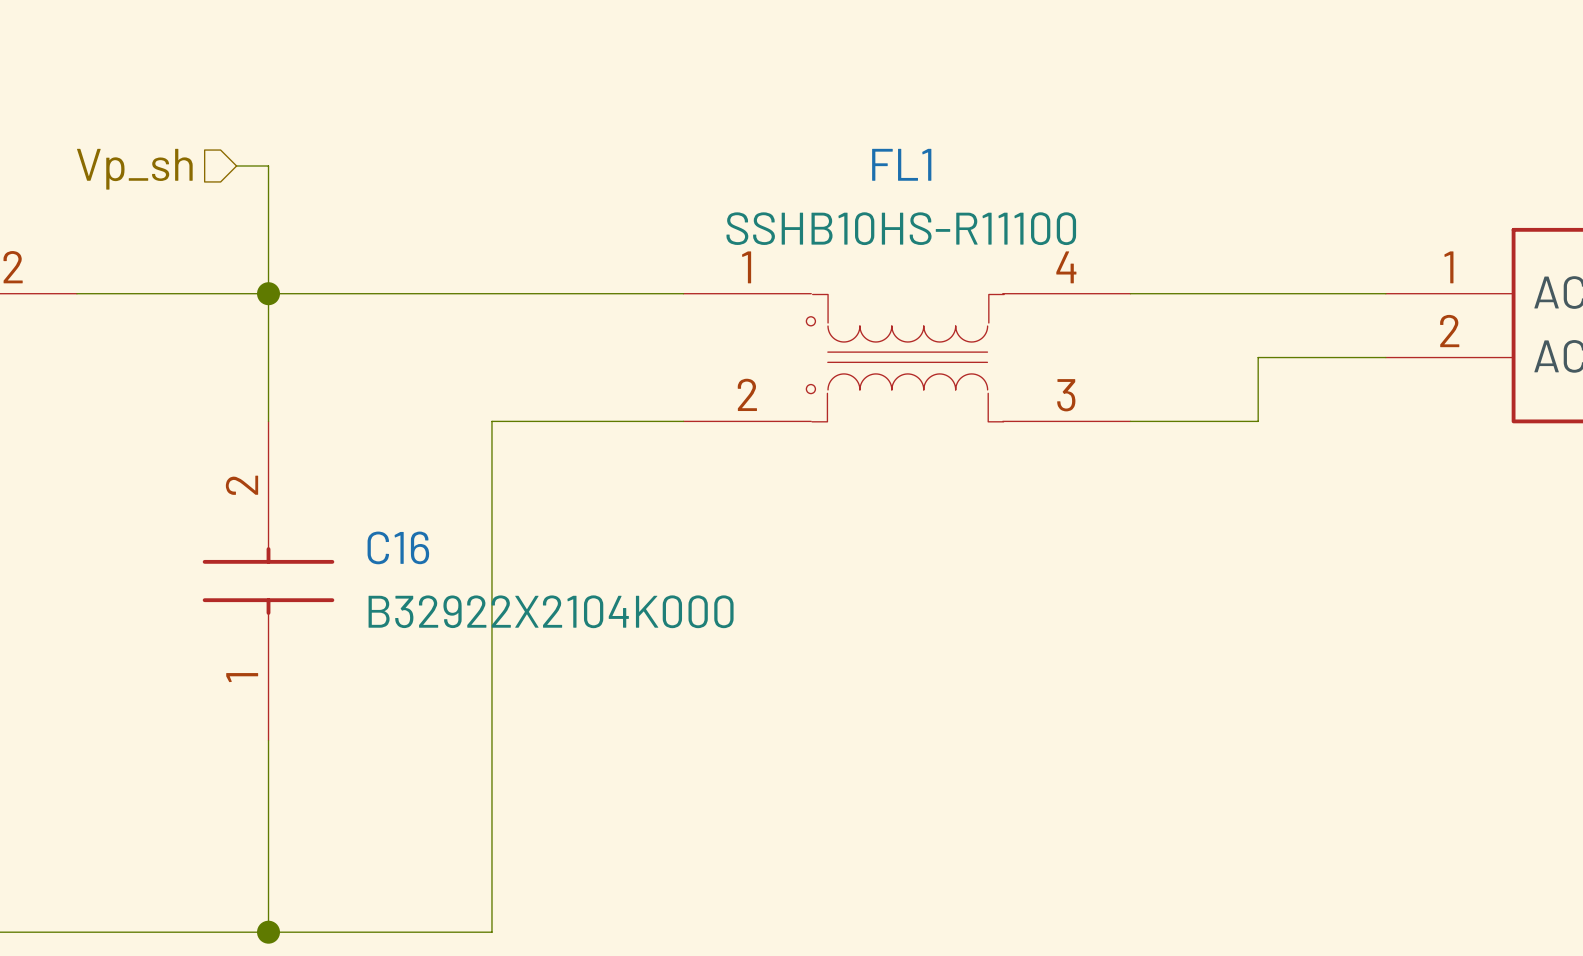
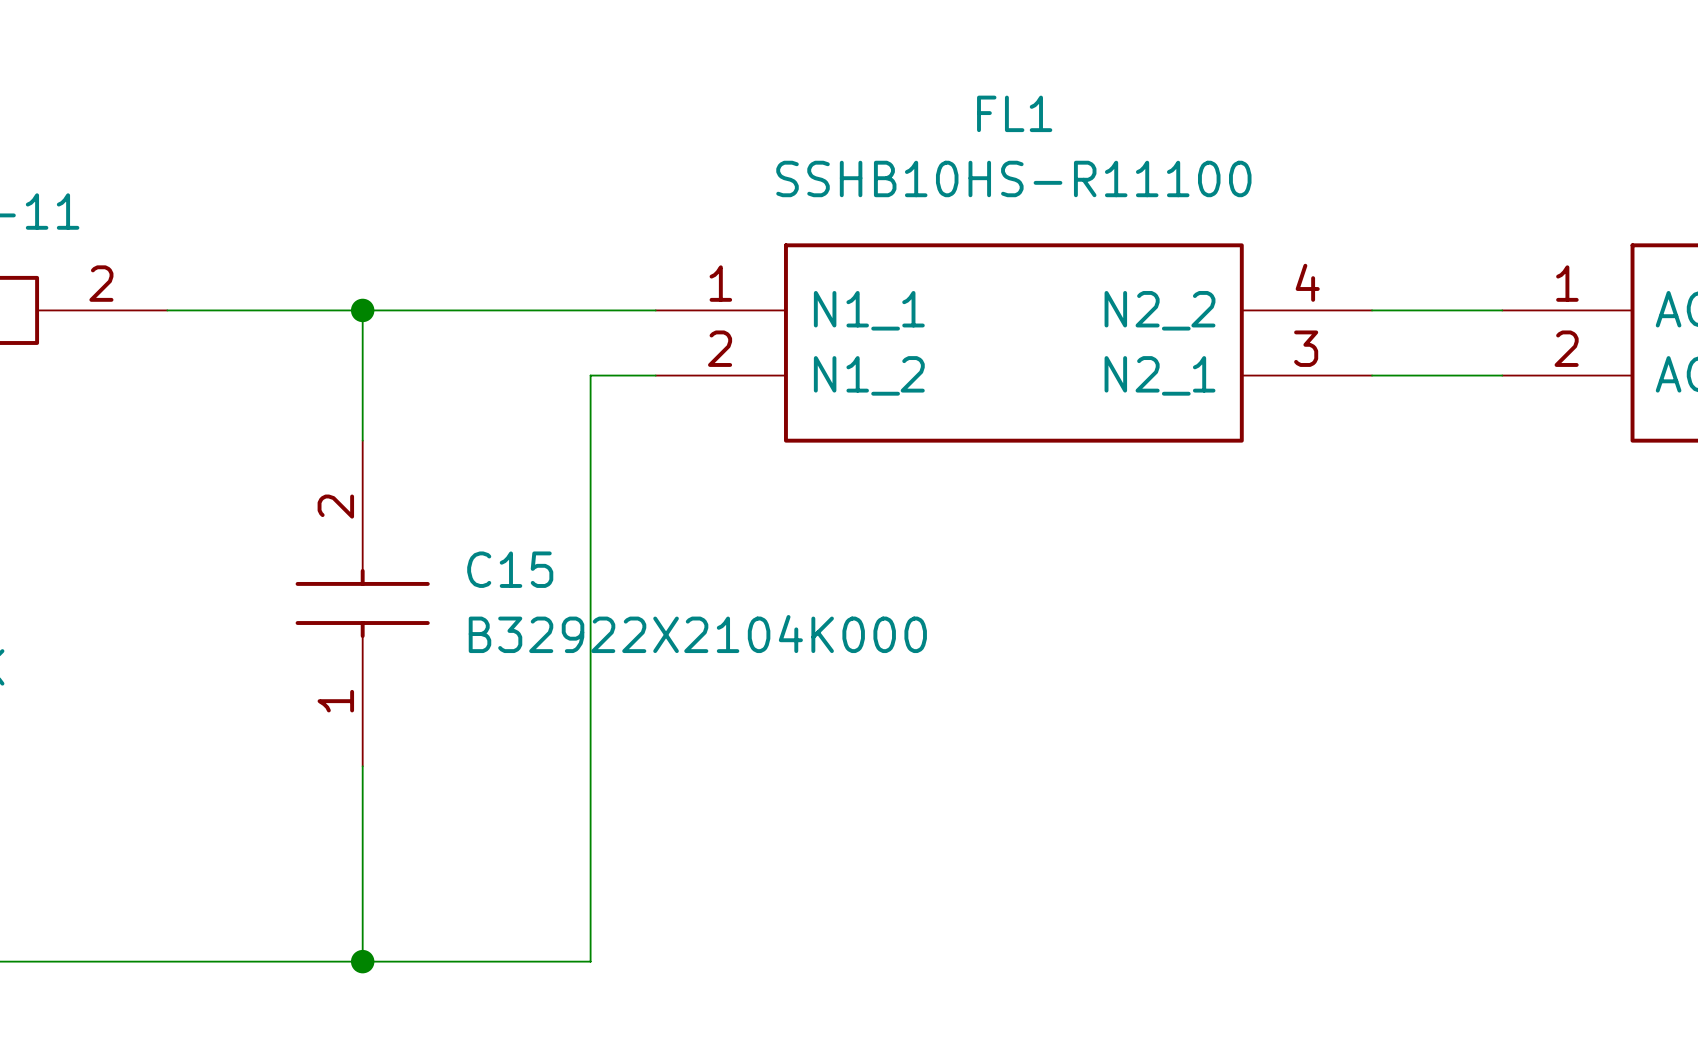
wire: (236, 166) (268, 166) (268, 293) -> none
hierarchical label: Vp_sh (134, 169) -> none
FL1 symbol: [683, 293, 1131, 422] -> [655, 243, 1373, 443]
wire: (1258, 357) (1258, 421) (1130, 421) -> none
wire: (491, 421) (683, 421) -> (590, 440) (590, 375) (655, 375)
C16 name: C16 (398, 547) -> C15 (510, 569)

